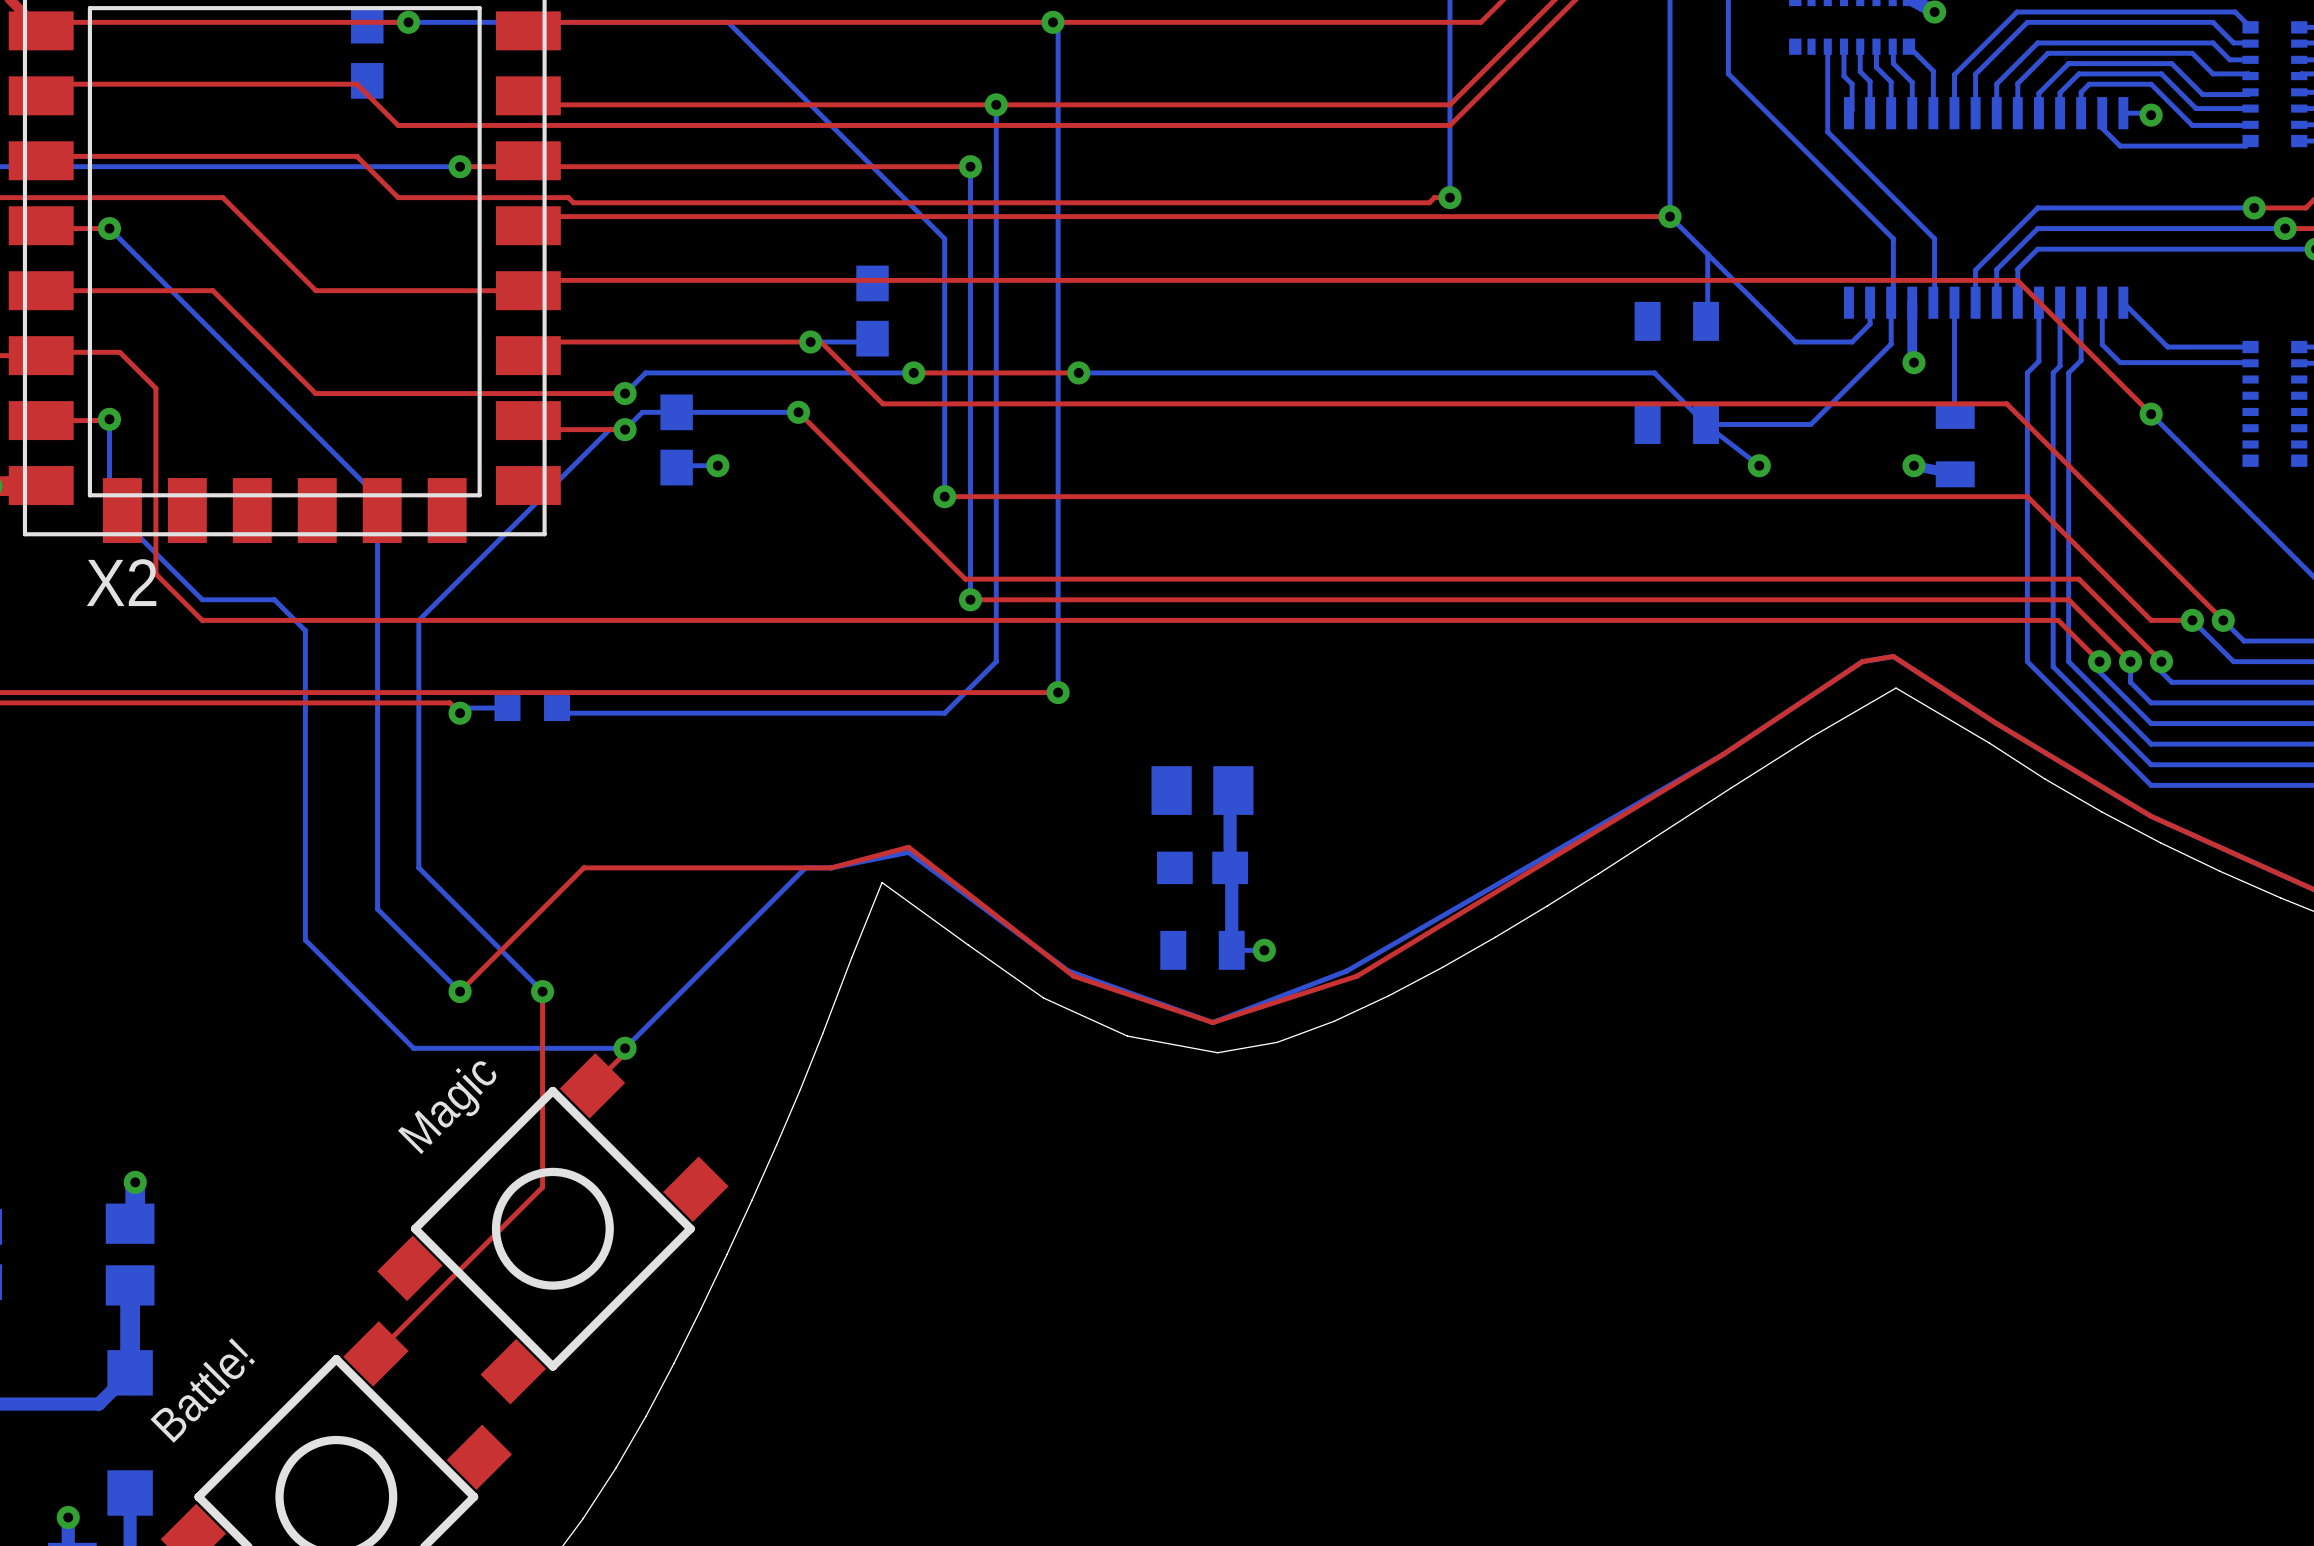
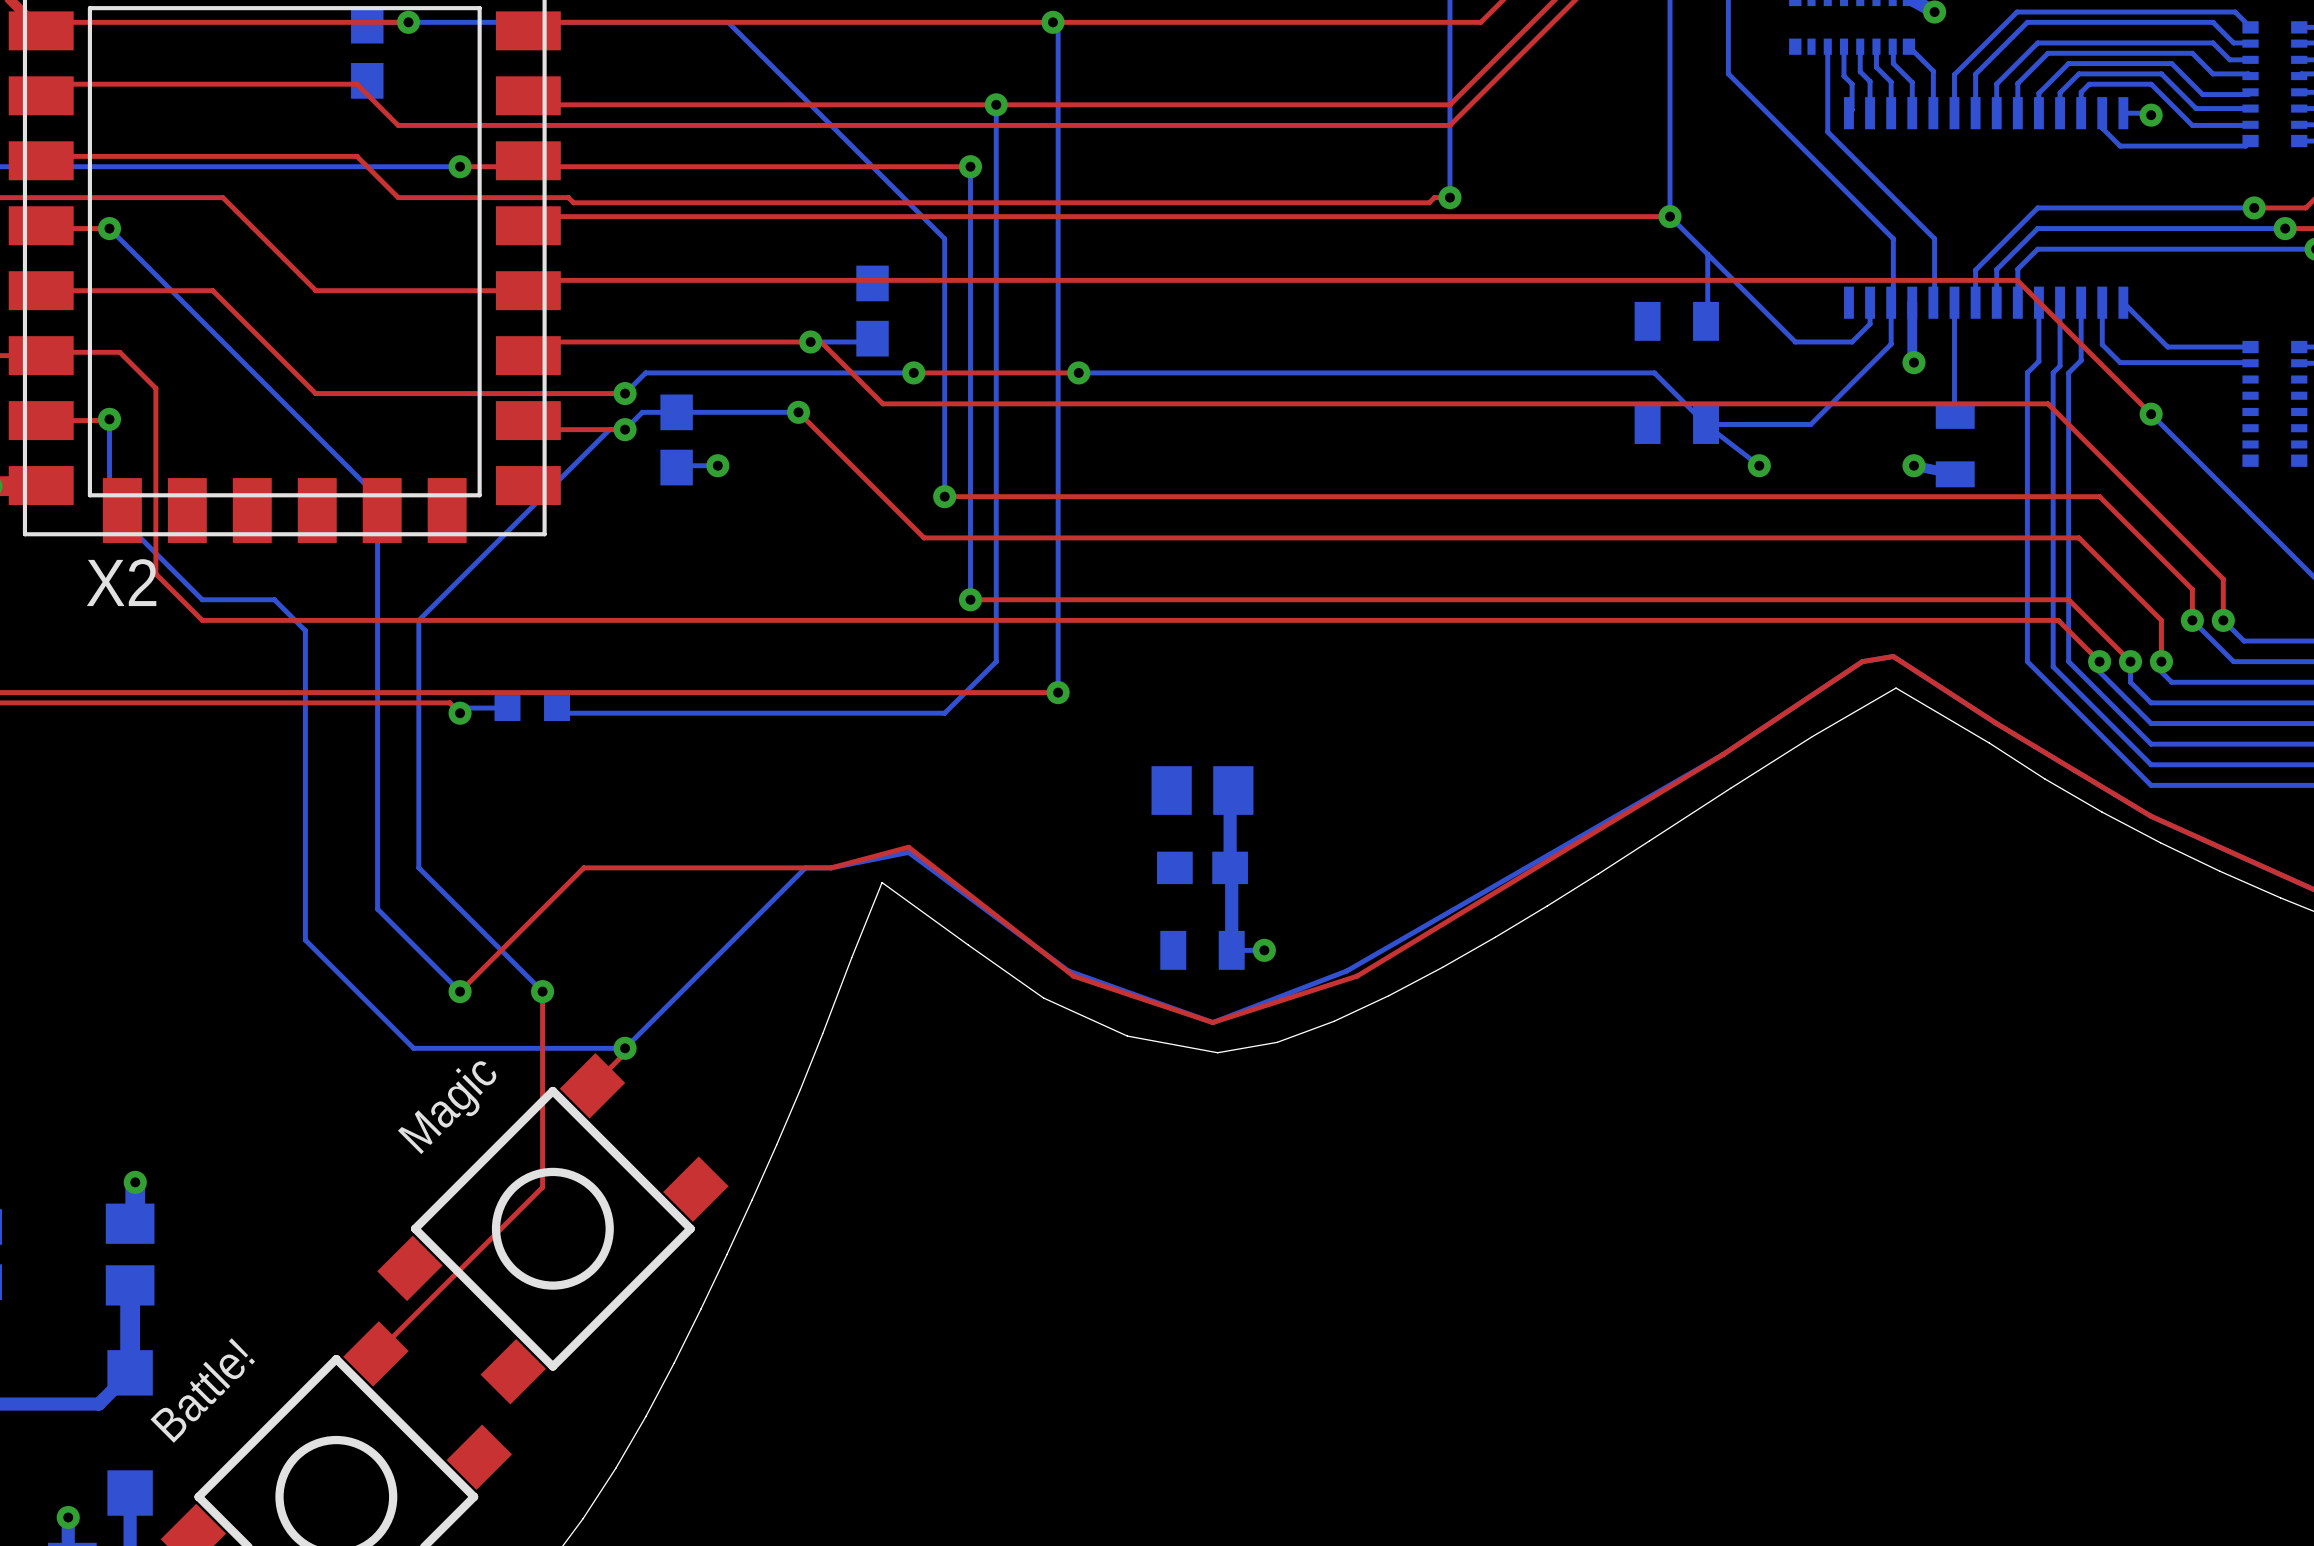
top track: (2006, 403) (2099, 496) -> (2027, 496) (2099, 496)
top track: none -> (2006, 403) (2048, 403) (2223, 579) (2223, 620)
top track: (2027, 496) (2151, 620) (2192, 620) -> none
top track: (924, 537) (965, 579) (2078, 579) (2161, 661) -> (924, 537) (2078, 537) (2161, 620) (2161, 661)
top track: (2192, 589) (2223, 620) -> (2192, 589) (2192, 620)

